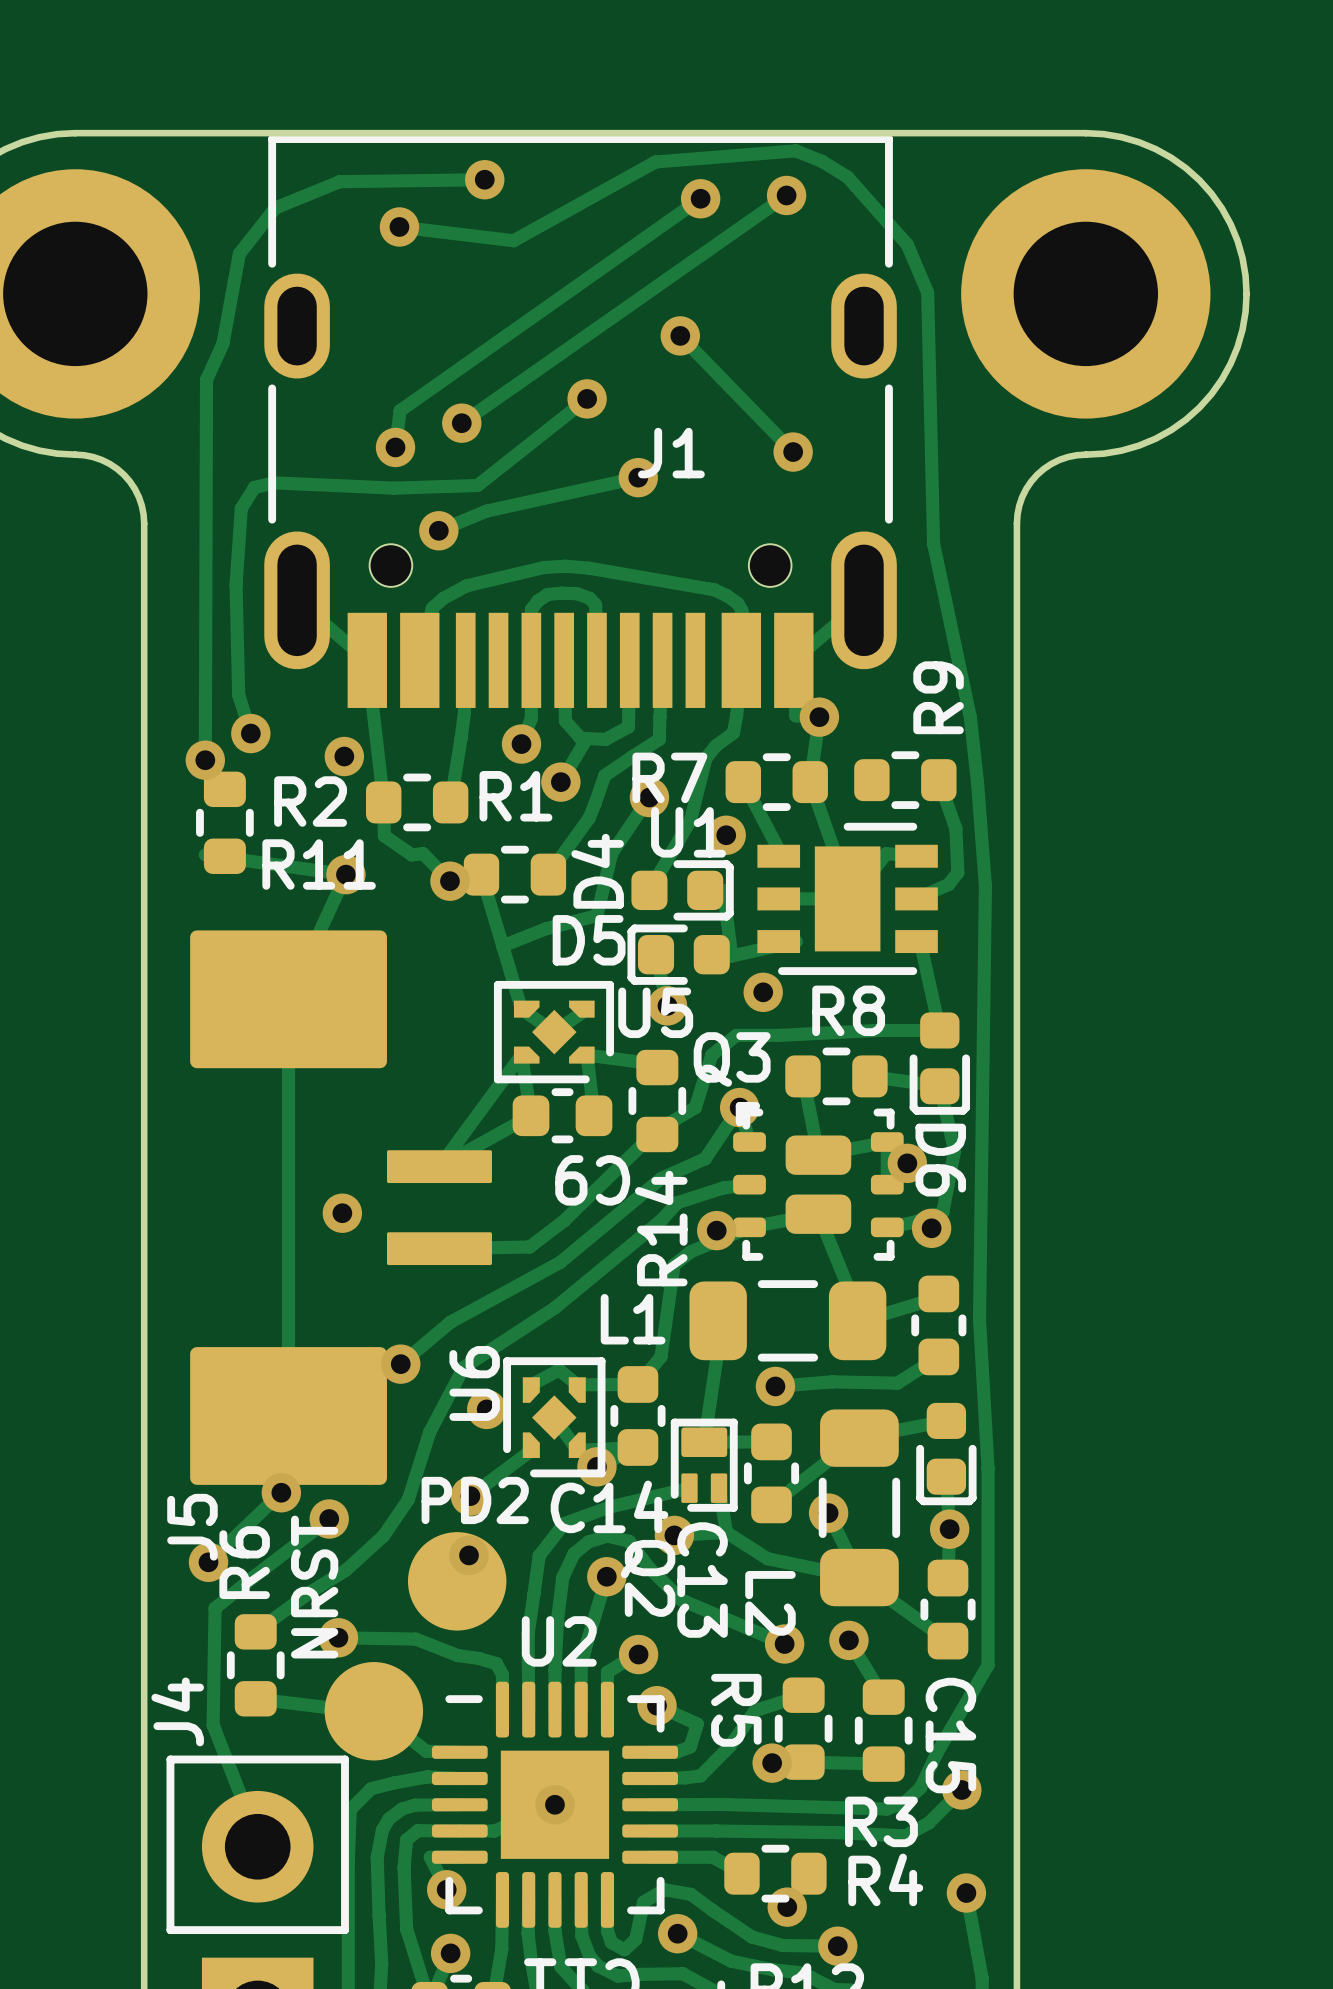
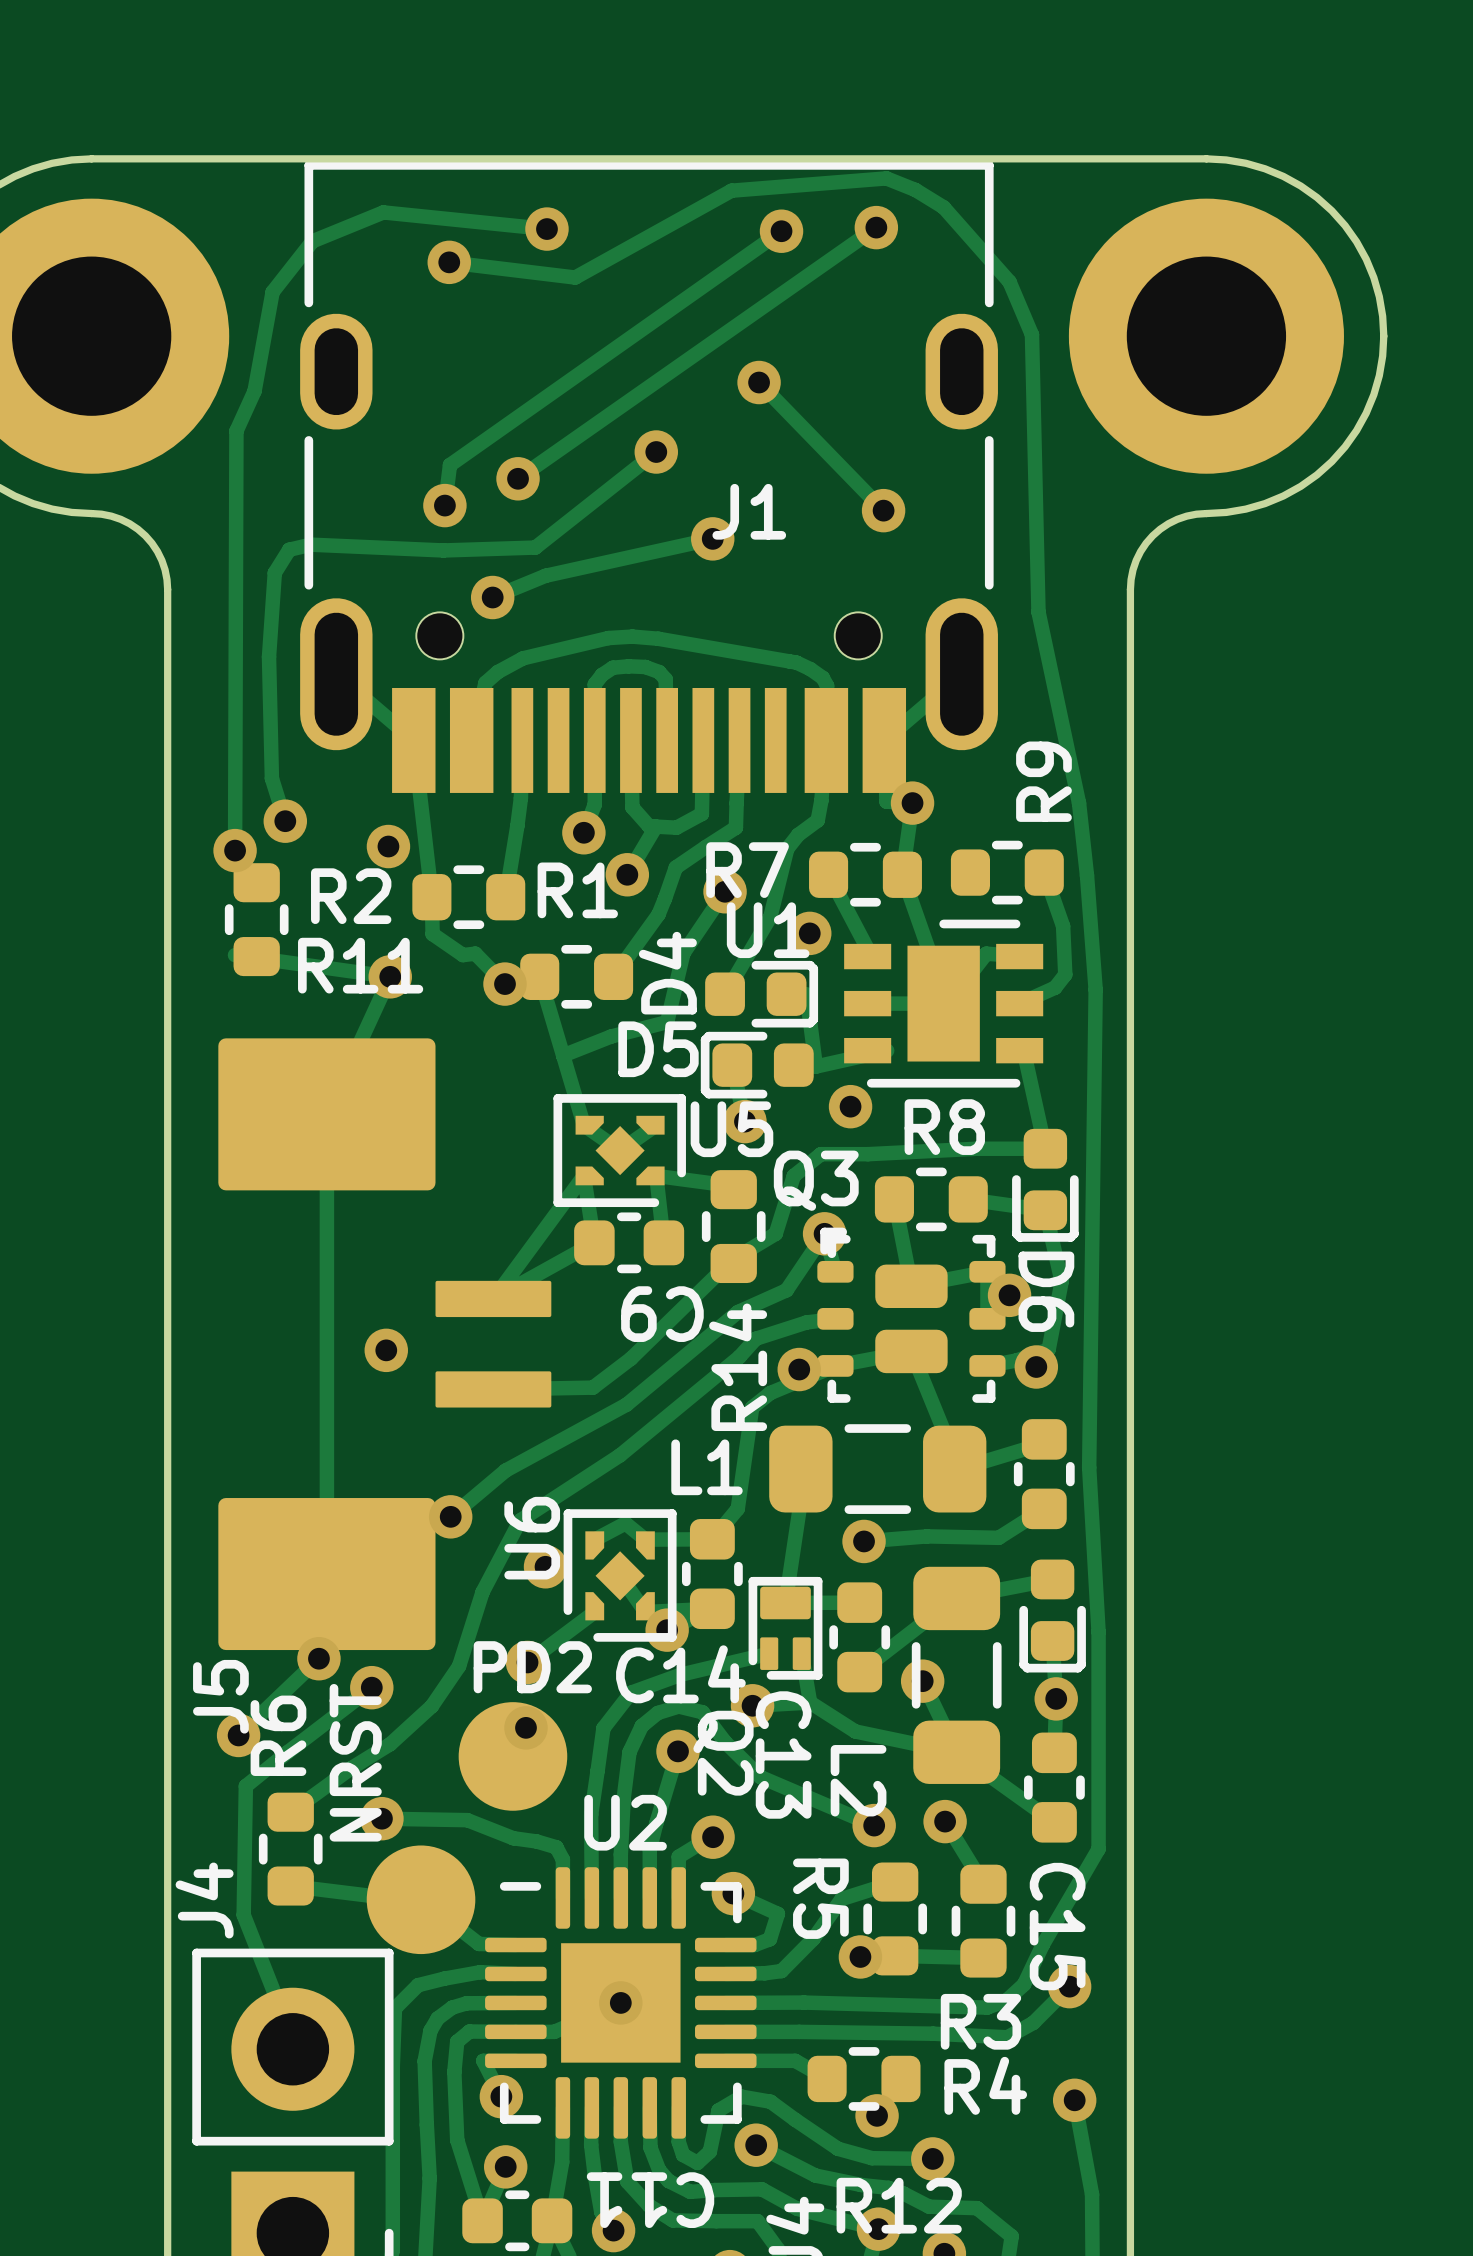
track: (484, 179) (339, 181) -> (546, 229) (383, 212)
via position: (484, 179) -> (546, 229)

